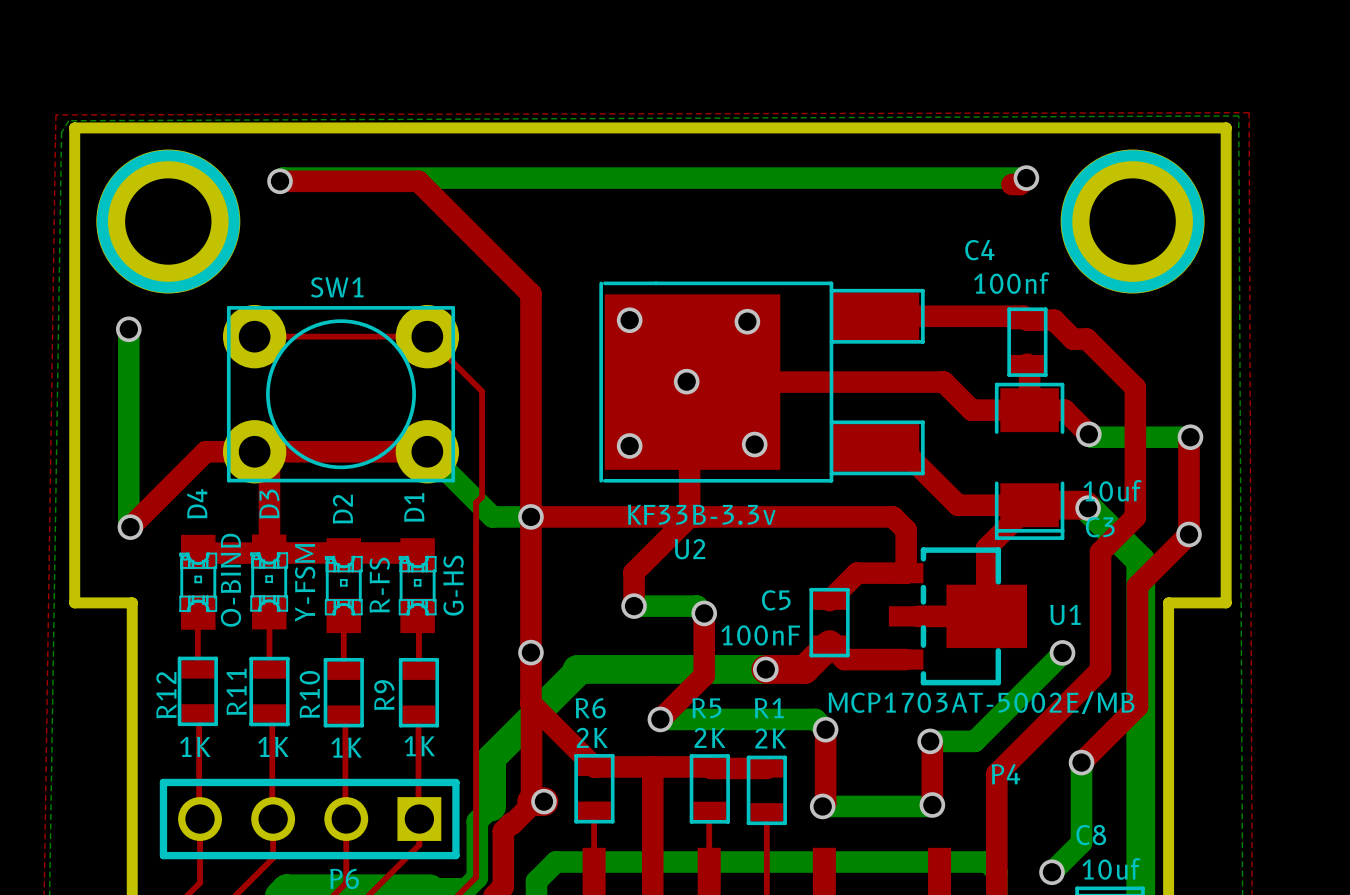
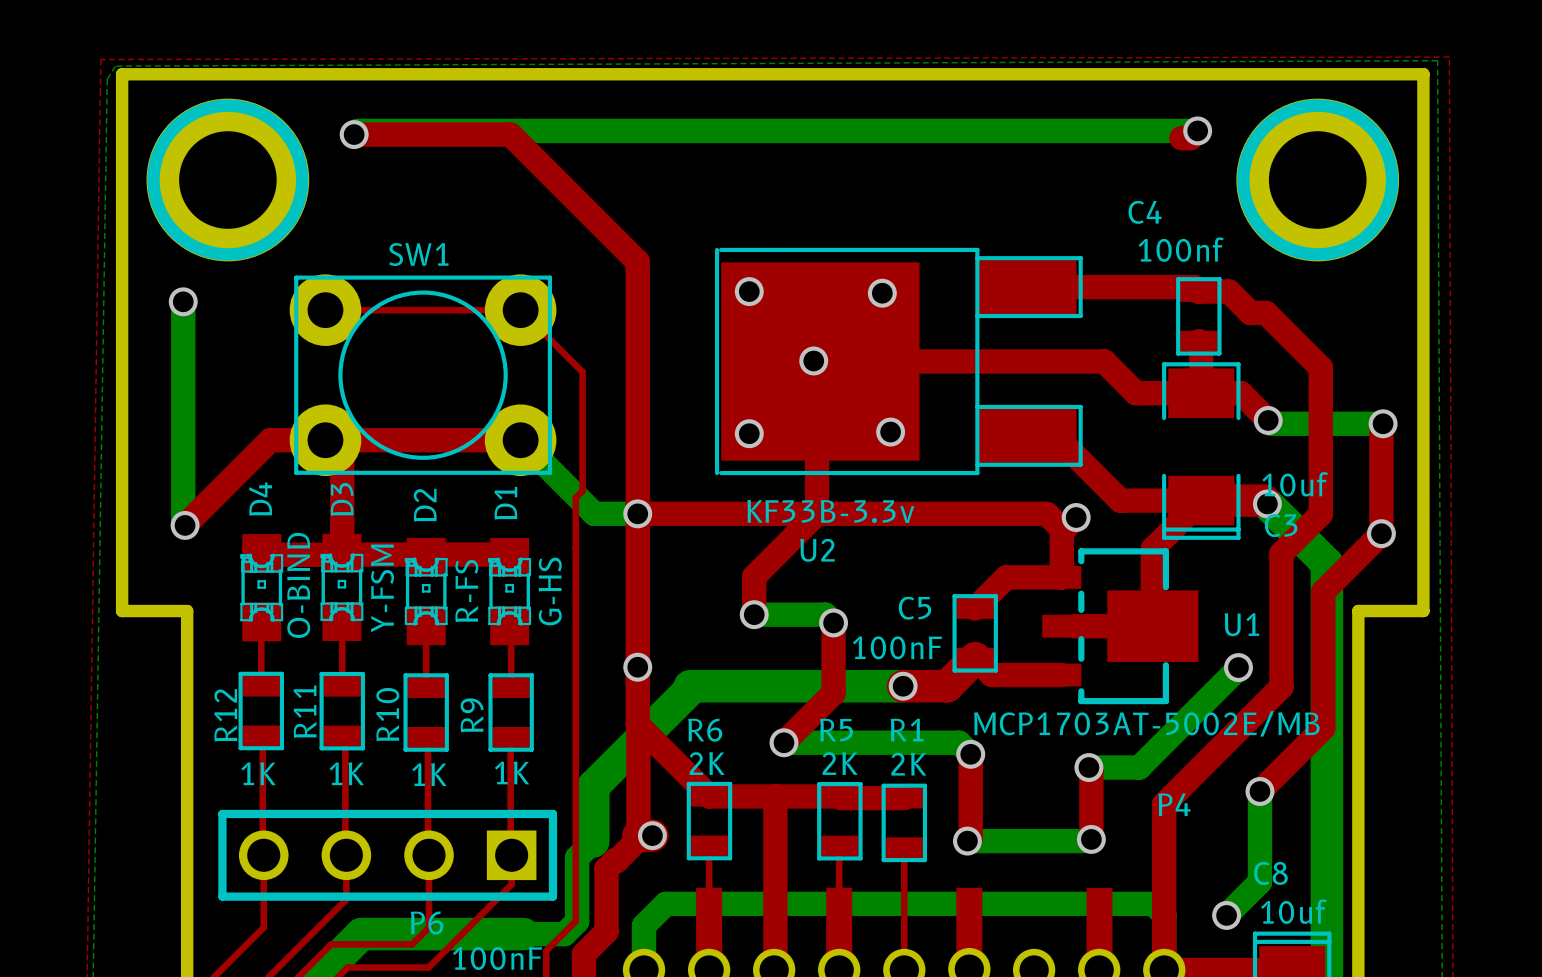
via: none -> (1076, 517)

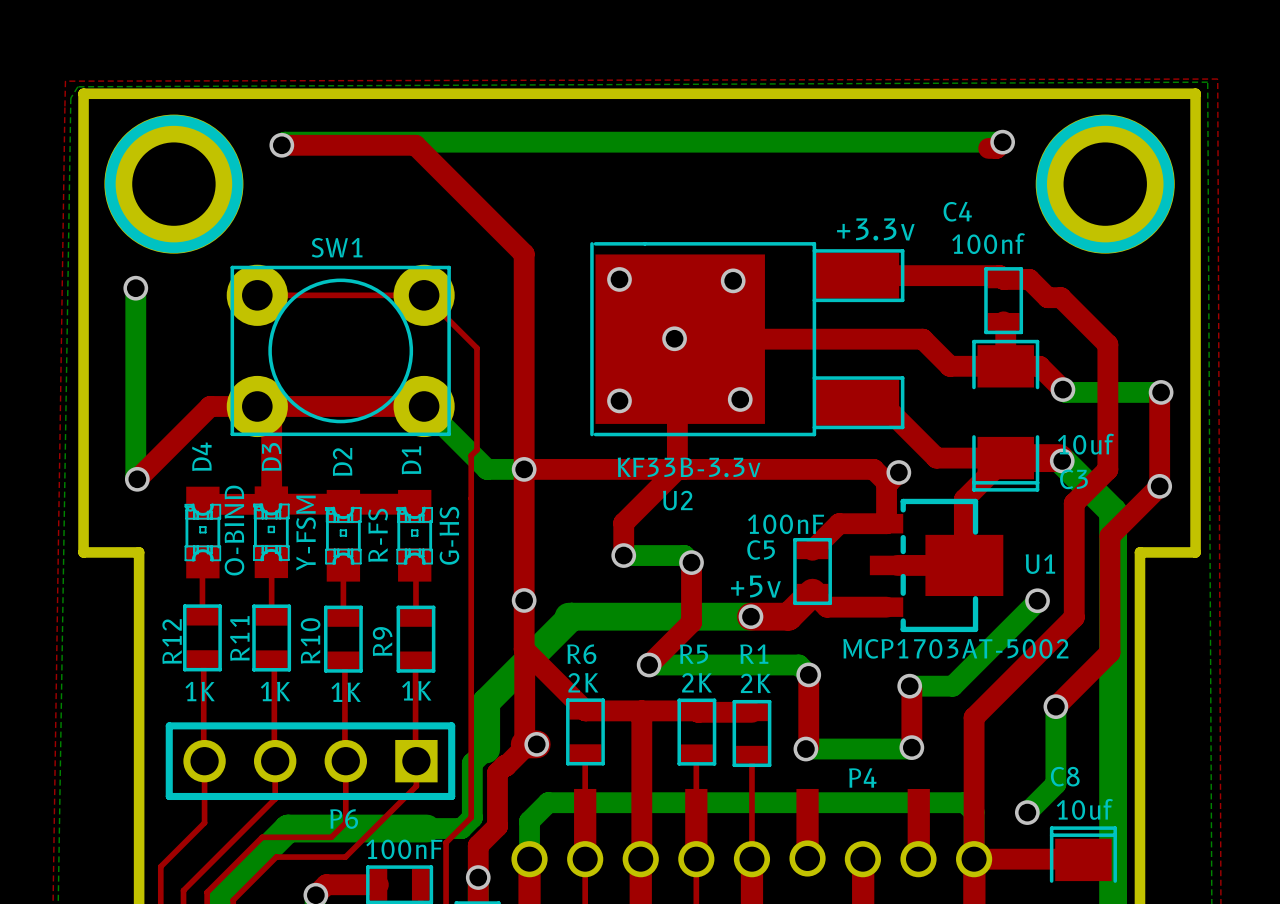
text: none -> +3.3v (875, 229)
C5 value position: 100nF (897, 647) -> 100nF (786, 524)
text: none -> +5v (755, 586)
U1 value: MCP1703AT-5002E/MB (1146, 723) -> MCP1703AT-5002 (955, 648)
P4 name position: P4 (1174, 804) -> P4 (862, 777)

